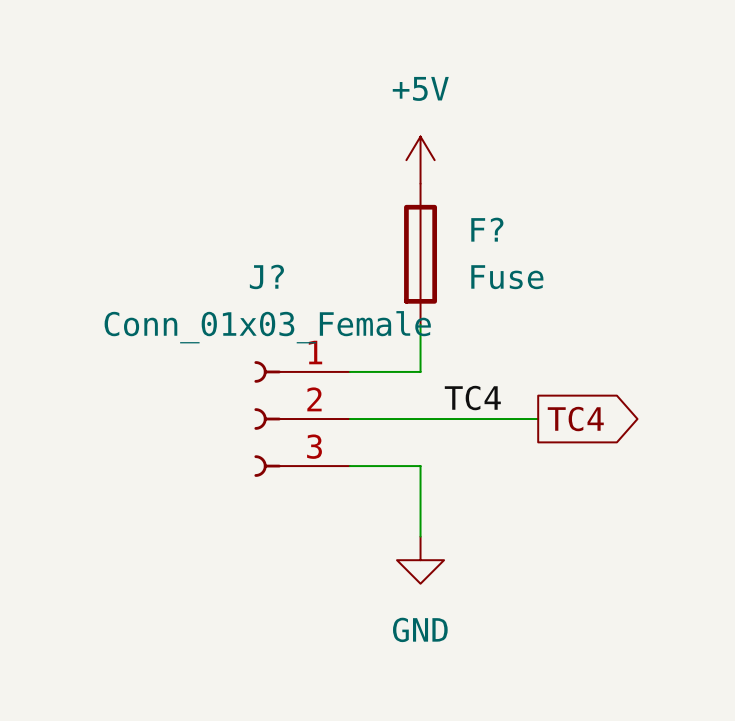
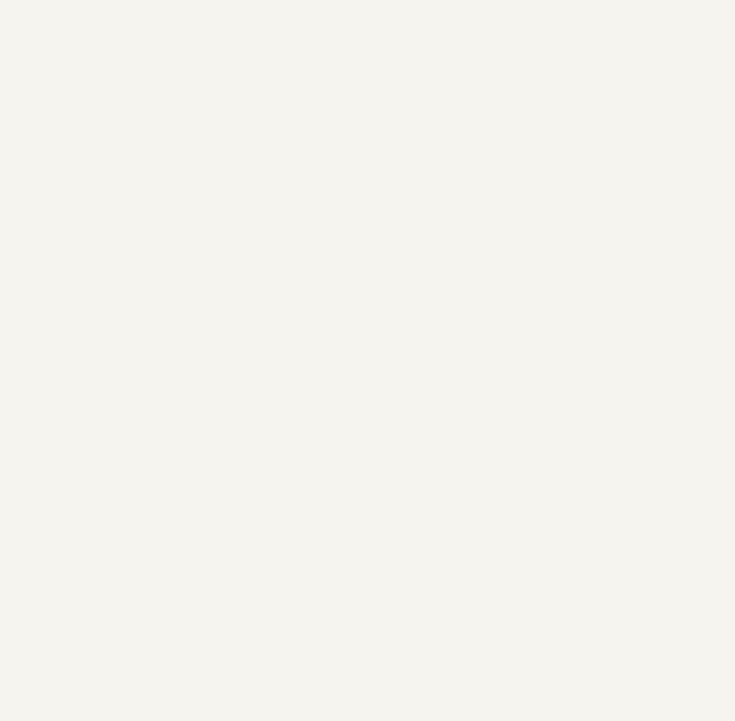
power symbol: +5V (420, 160) -> none
F?: Fuse (420, 254) -> none
wire: (420, 324) (420, 371) (349, 371) -> none
label: TC4 (472, 398) -> none
J?: Conn_01x03_Female (302, 419) -> none
wire: (349, 419) (538, 419) -> none
global label: TC4 (575, 419) -> none
wire: (349, 466) (420, 466) (420, 536) -> none
power symbol: GND (420, 560) -> none

